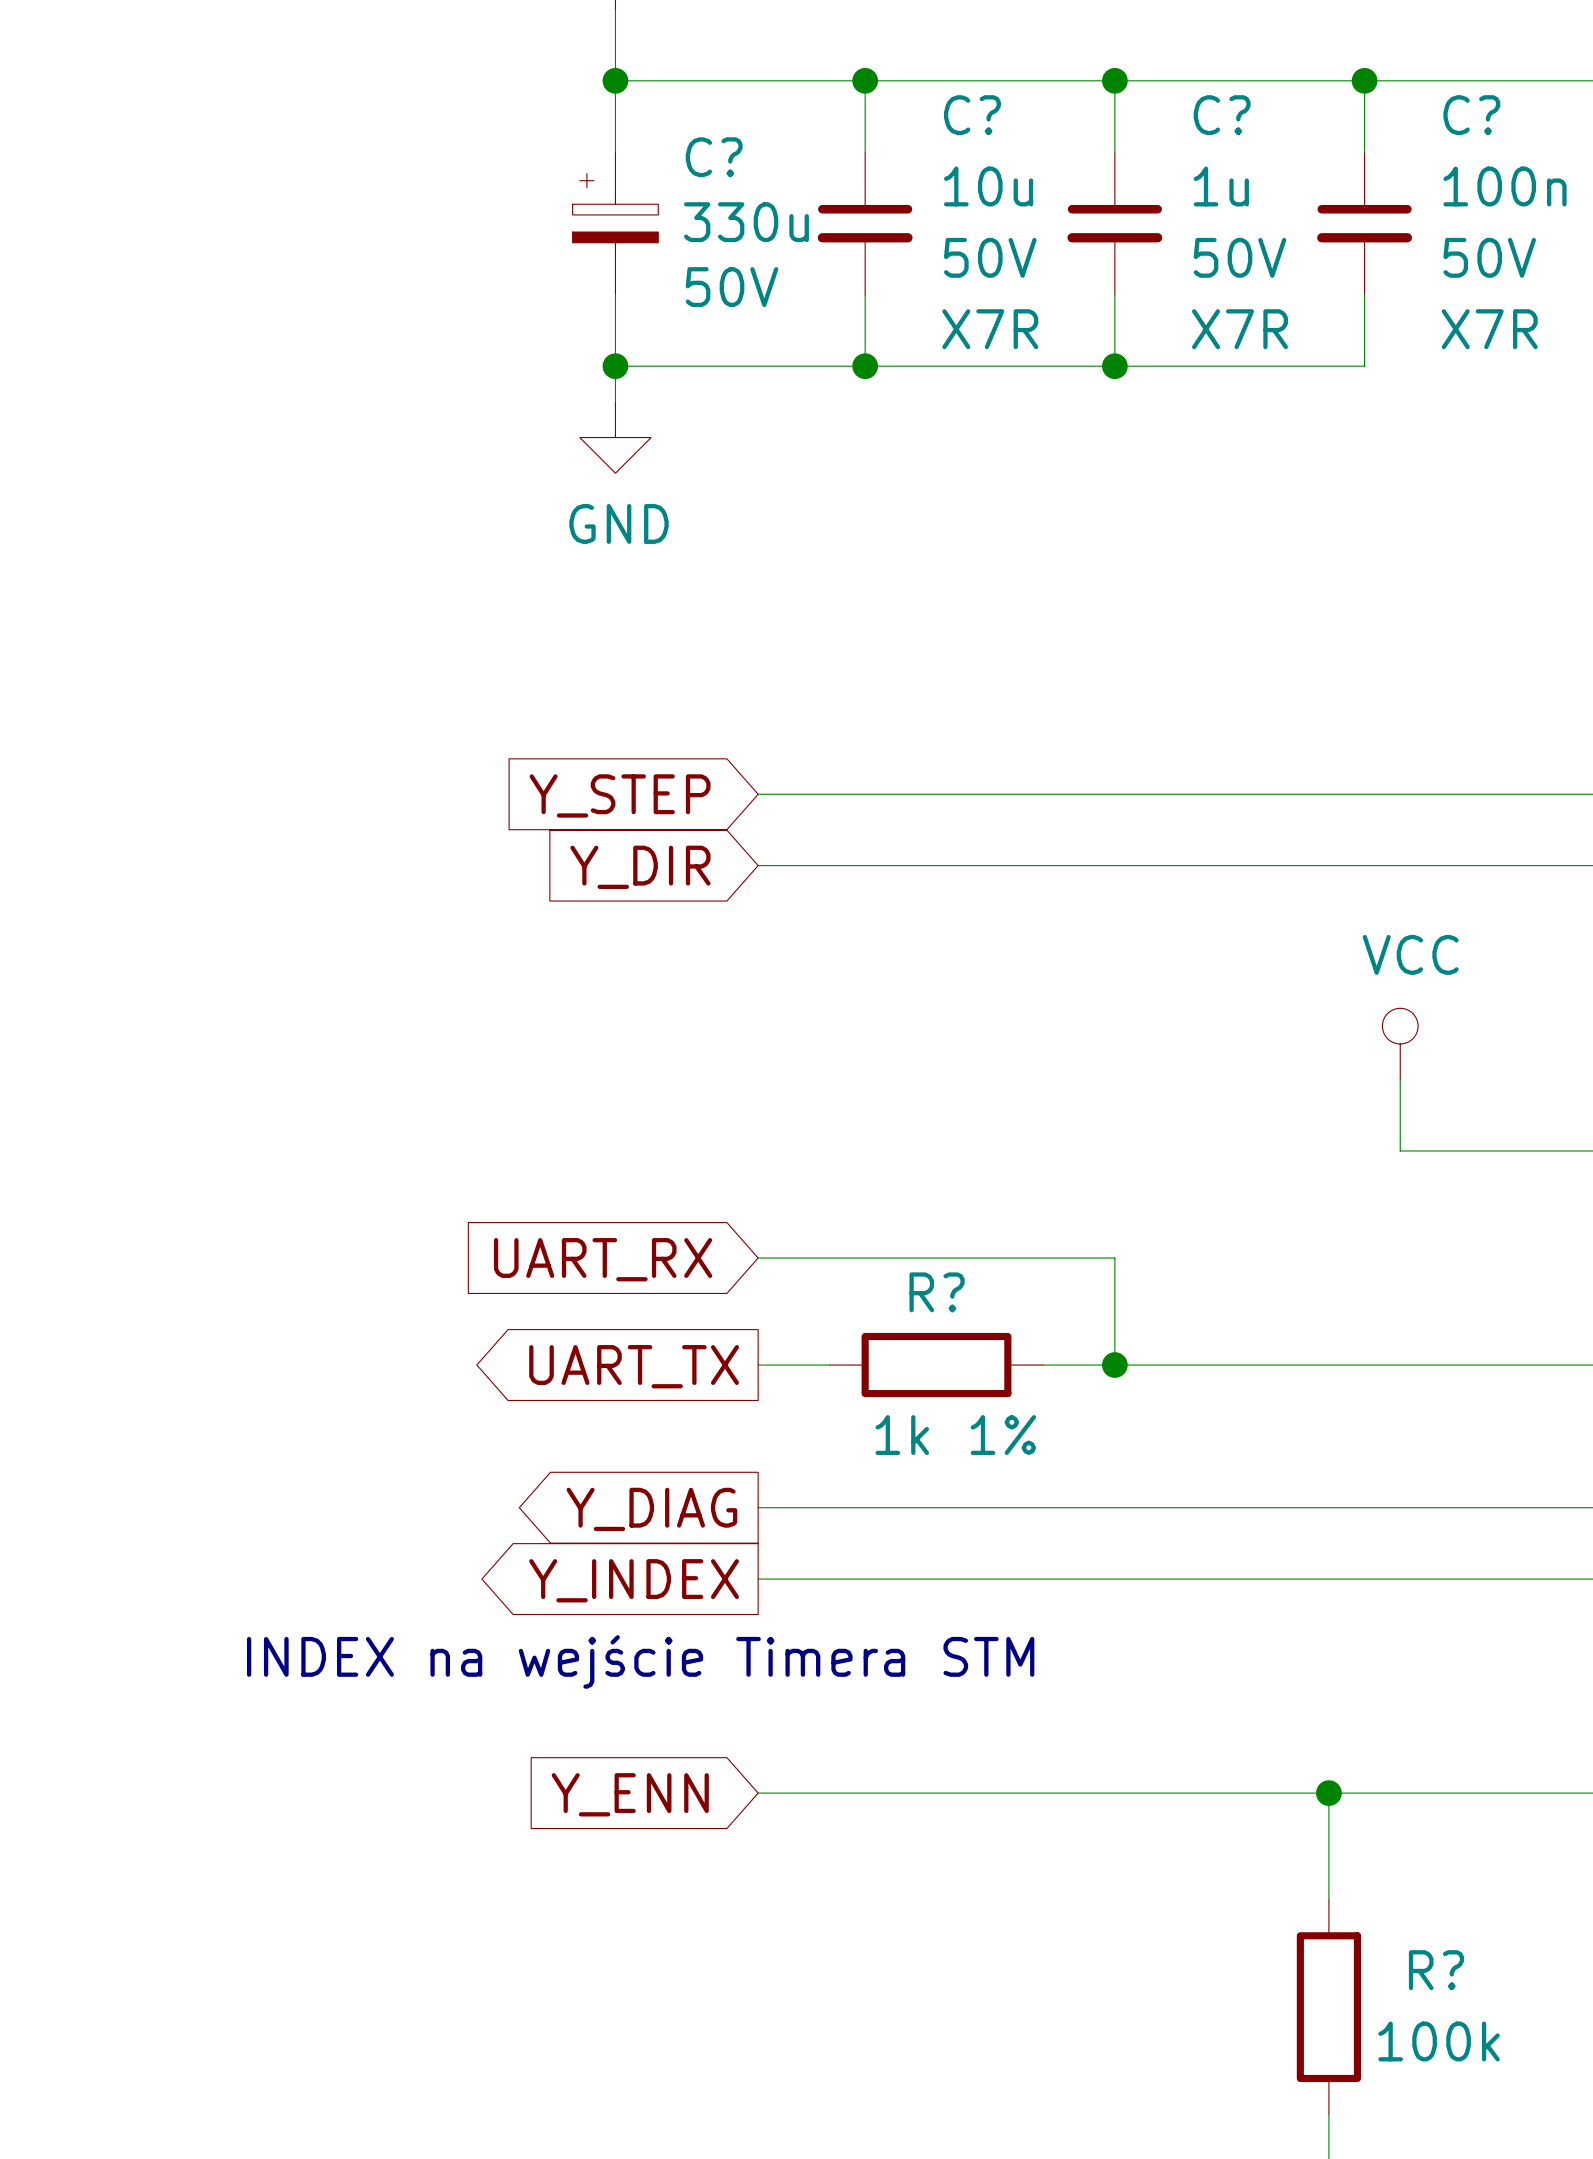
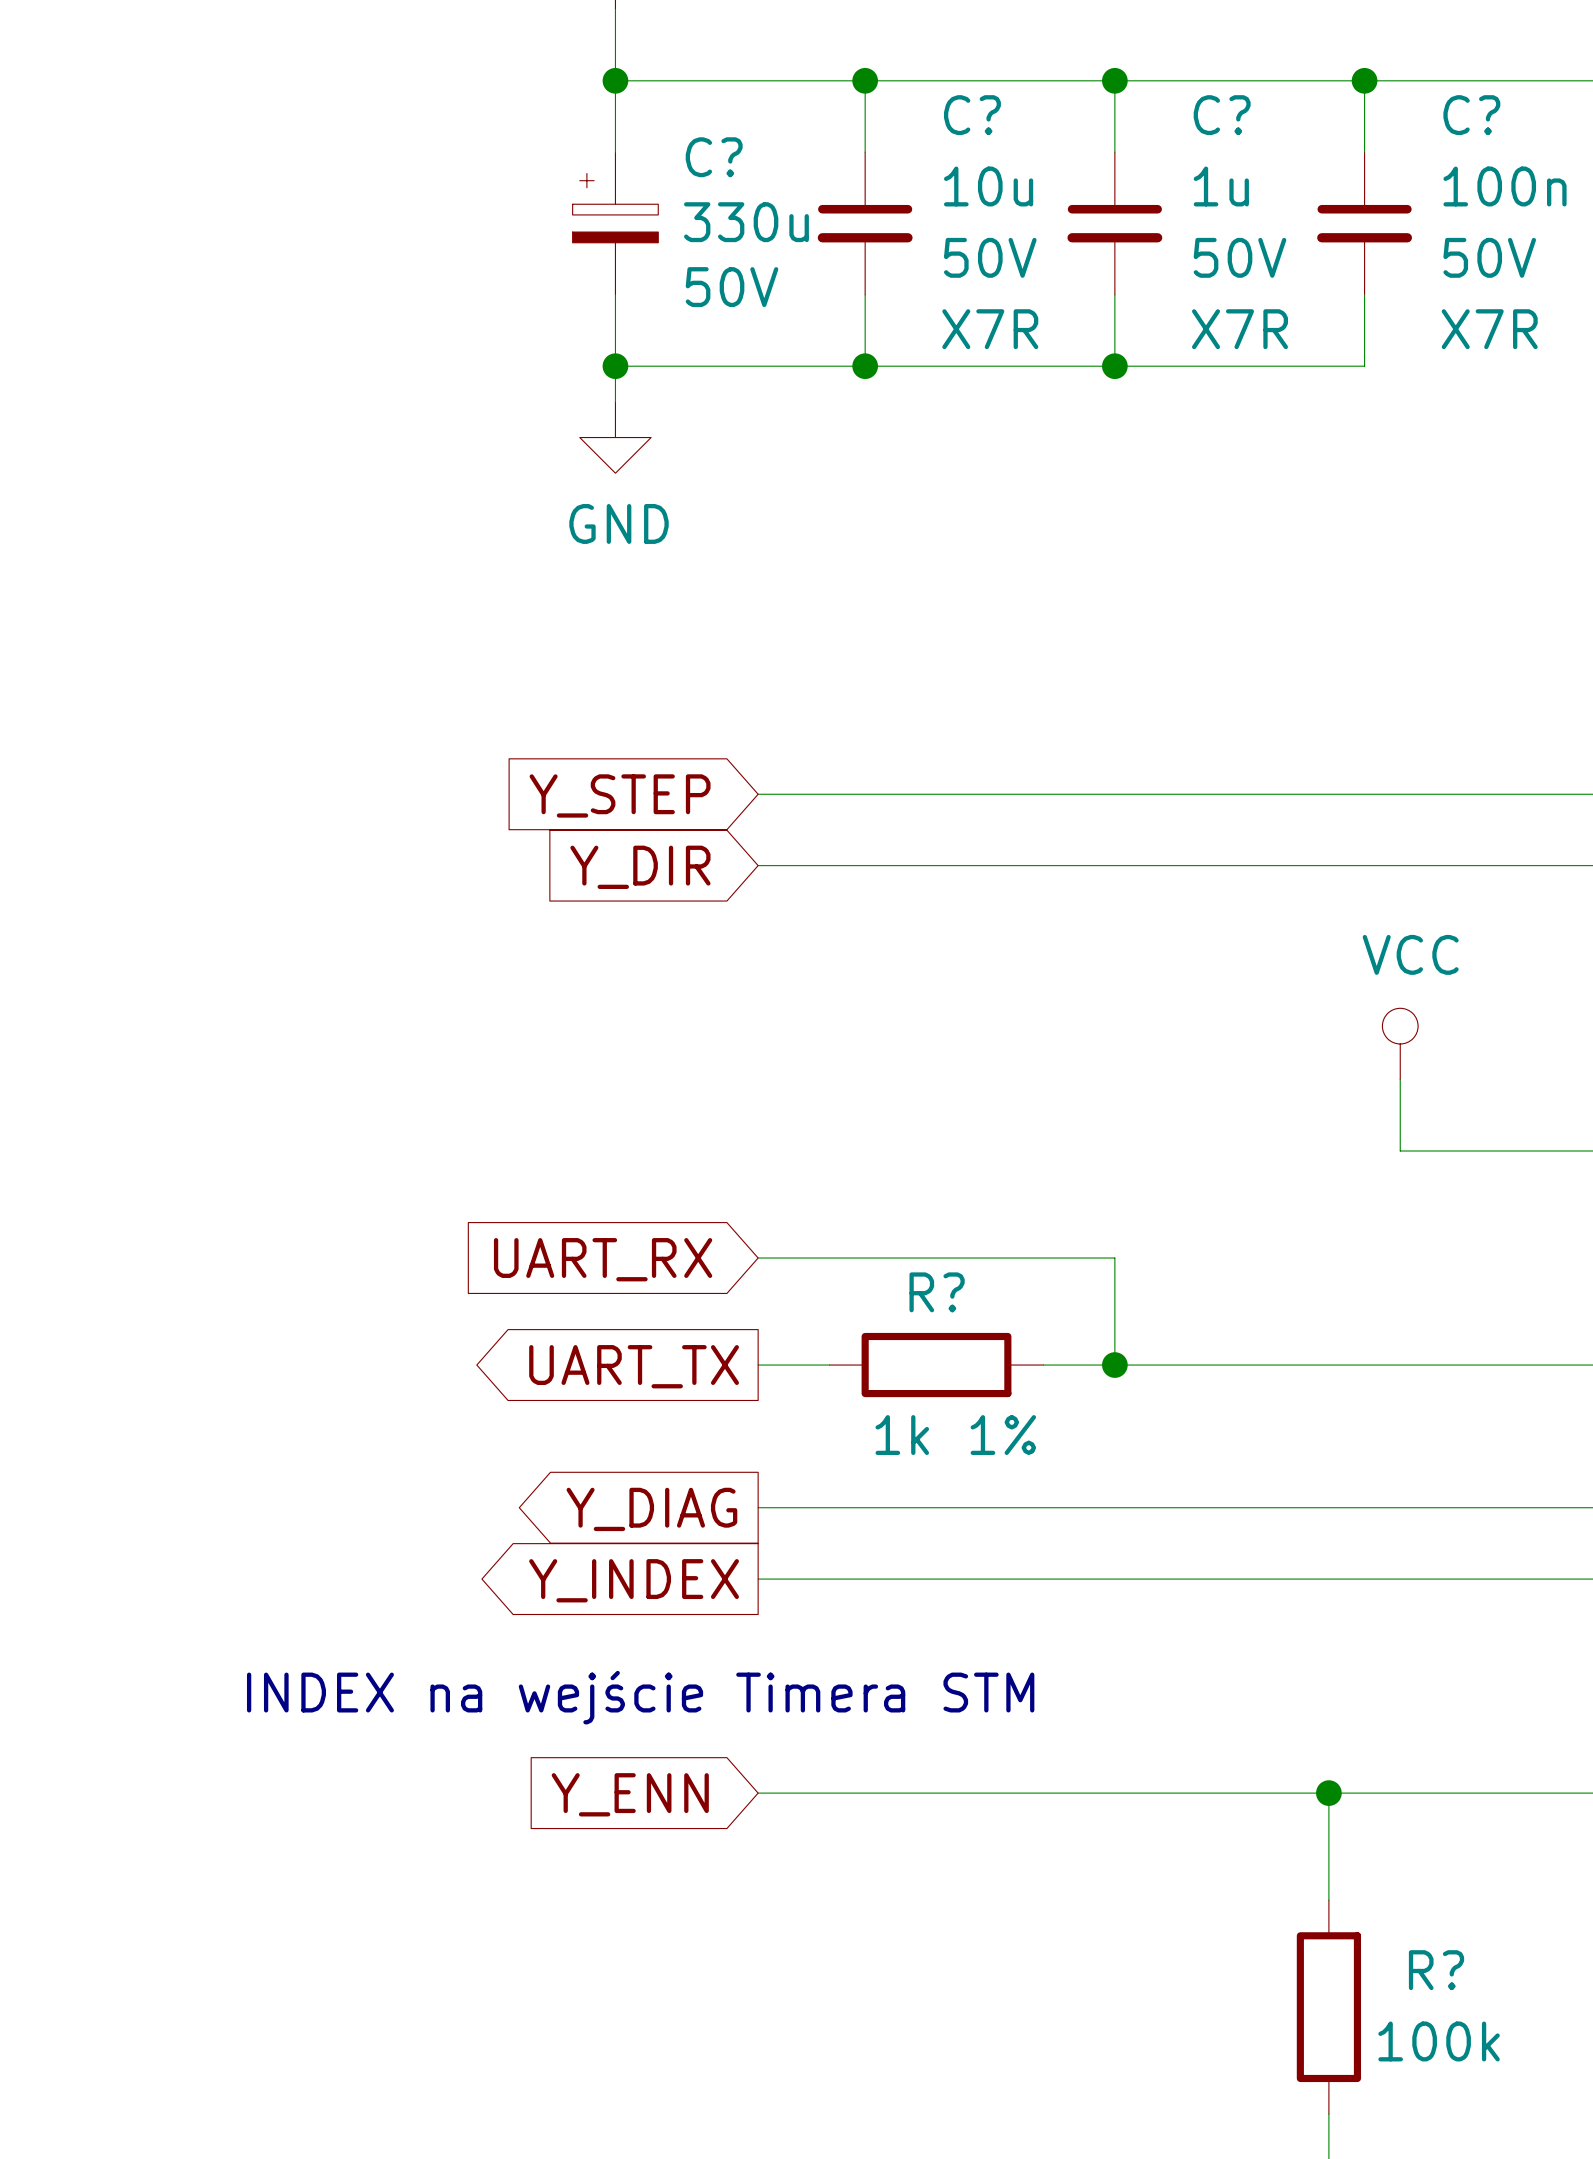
text position: INDEX na wejście Timera STM (640, 1661) -> INDEX na wejście Timera STM (640, 1697)

